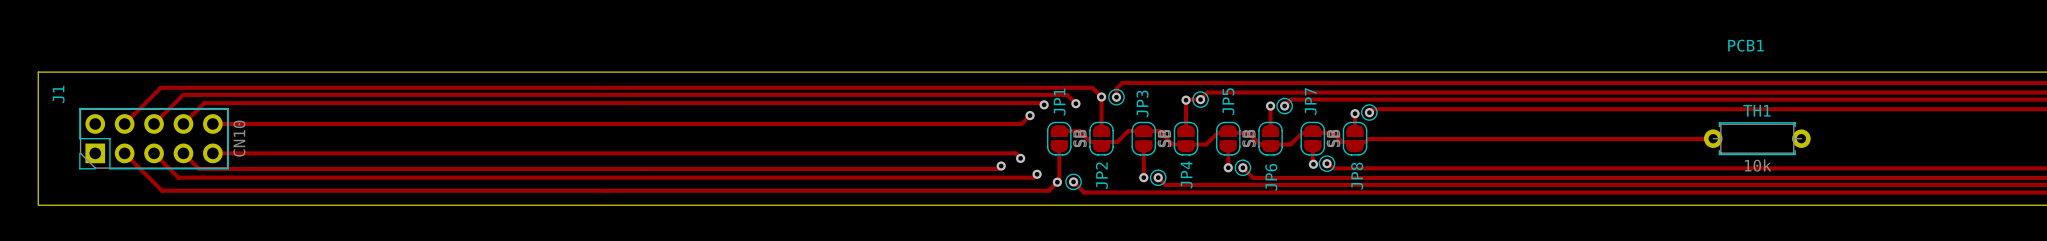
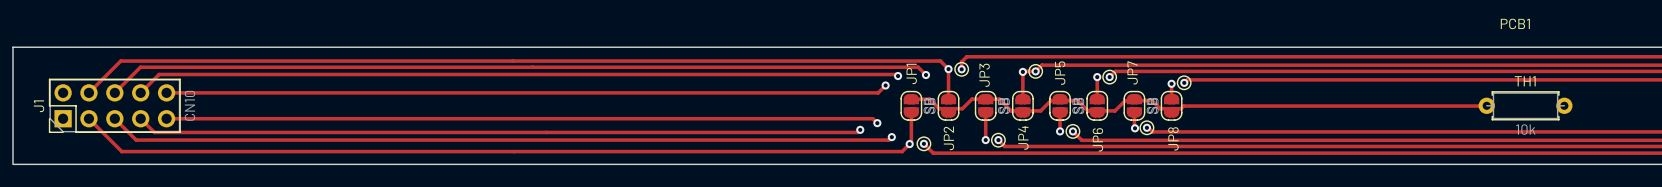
J1 name position: J1 (58, 94) -> J1 (39, 106)

